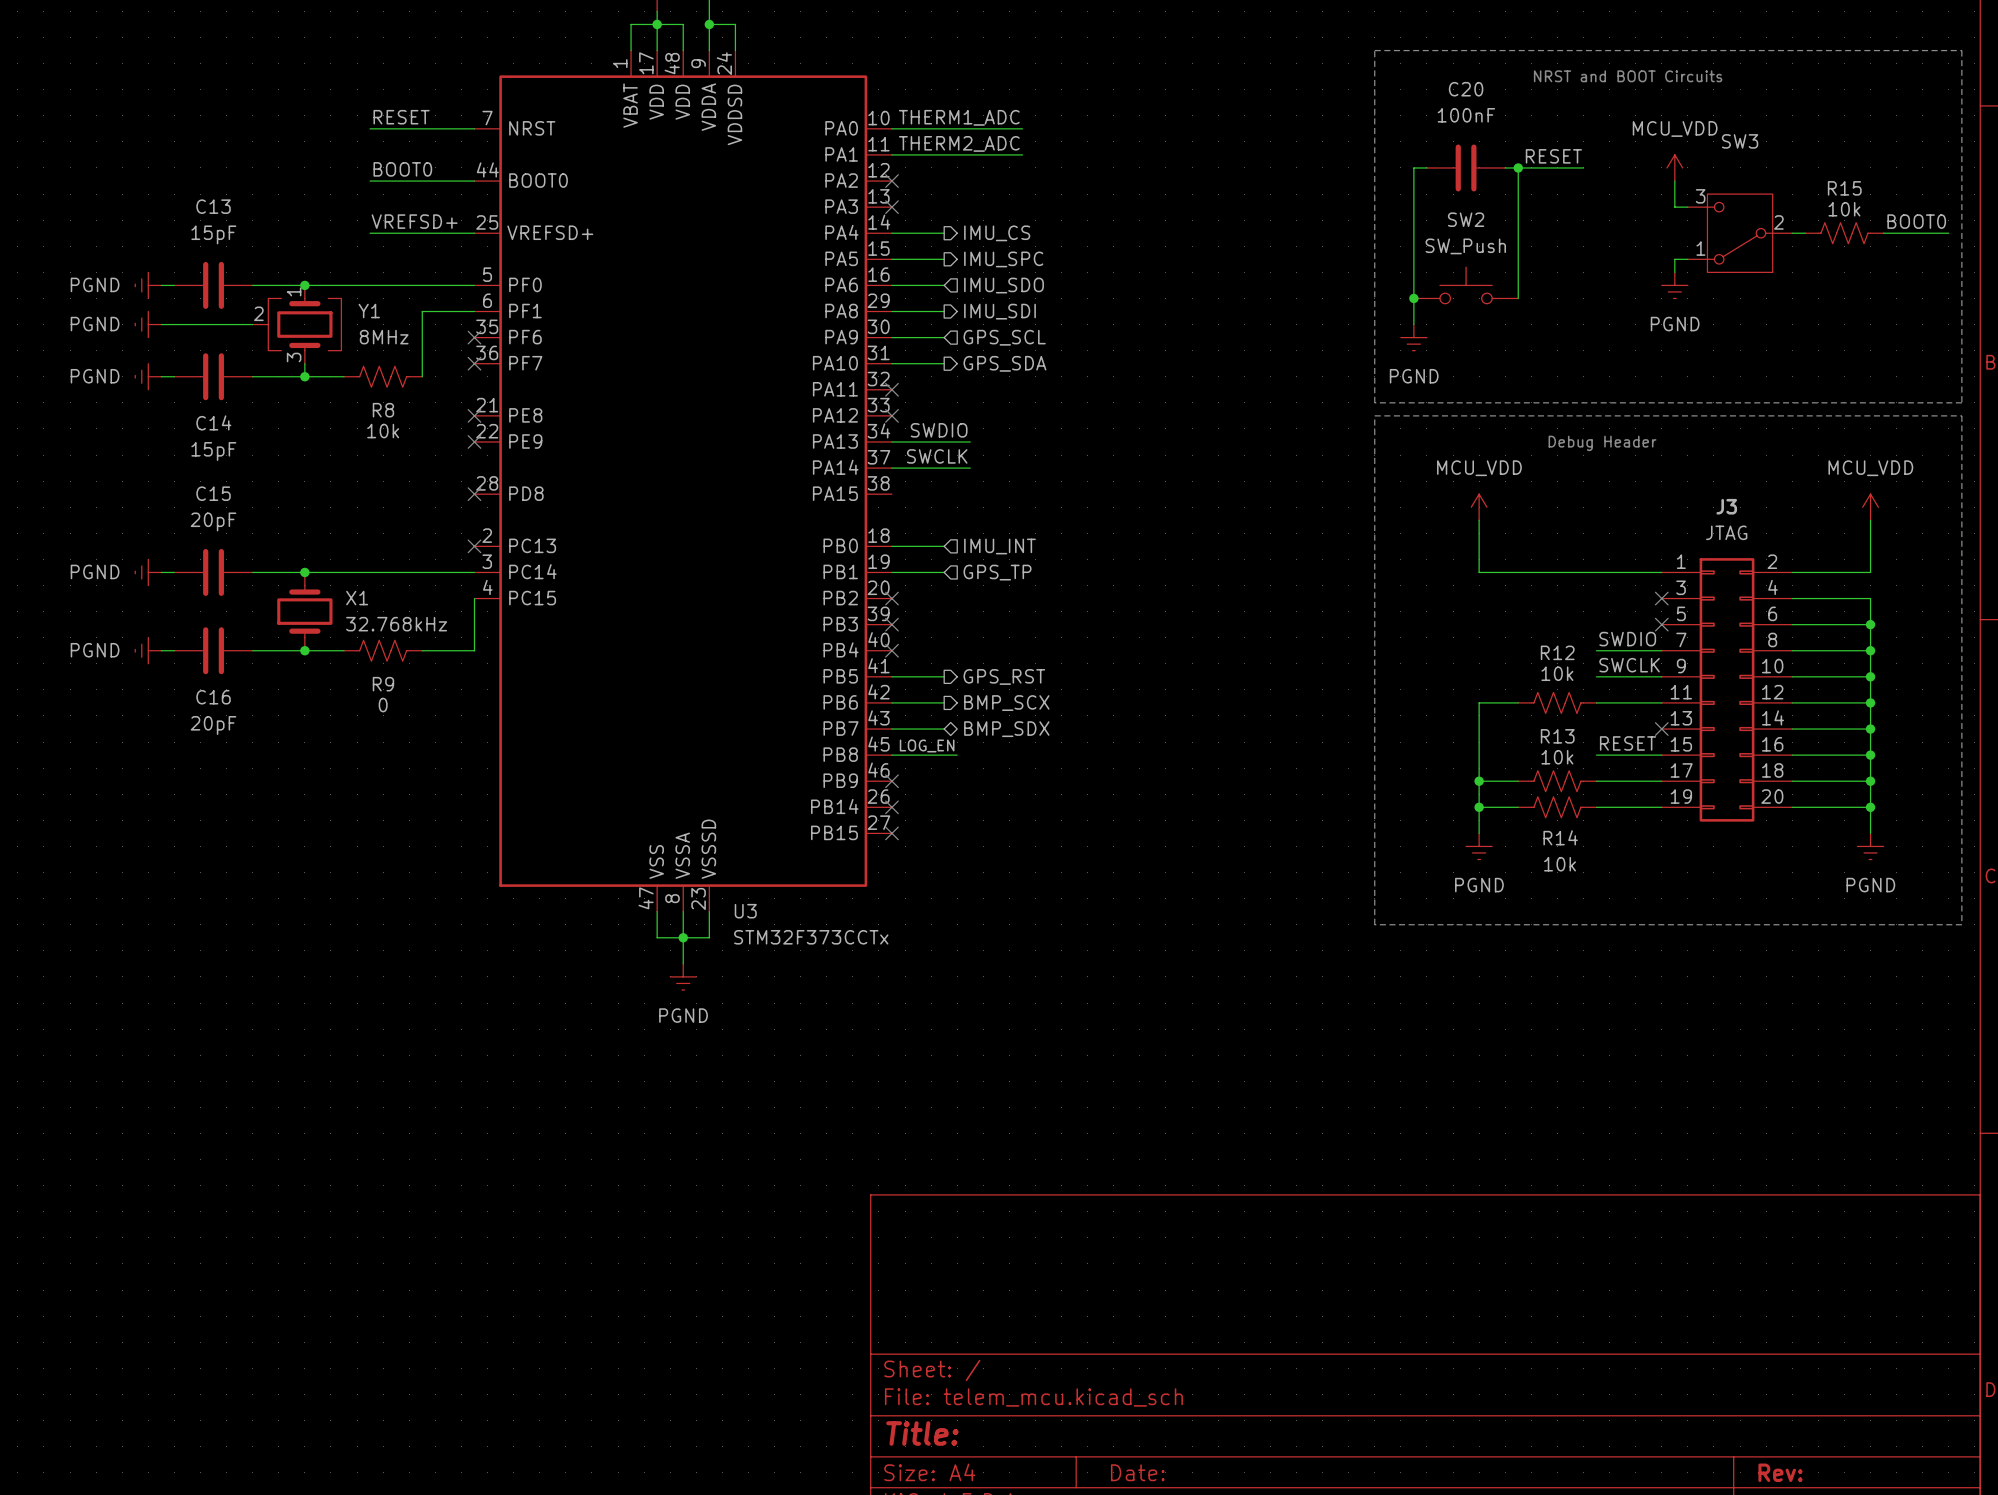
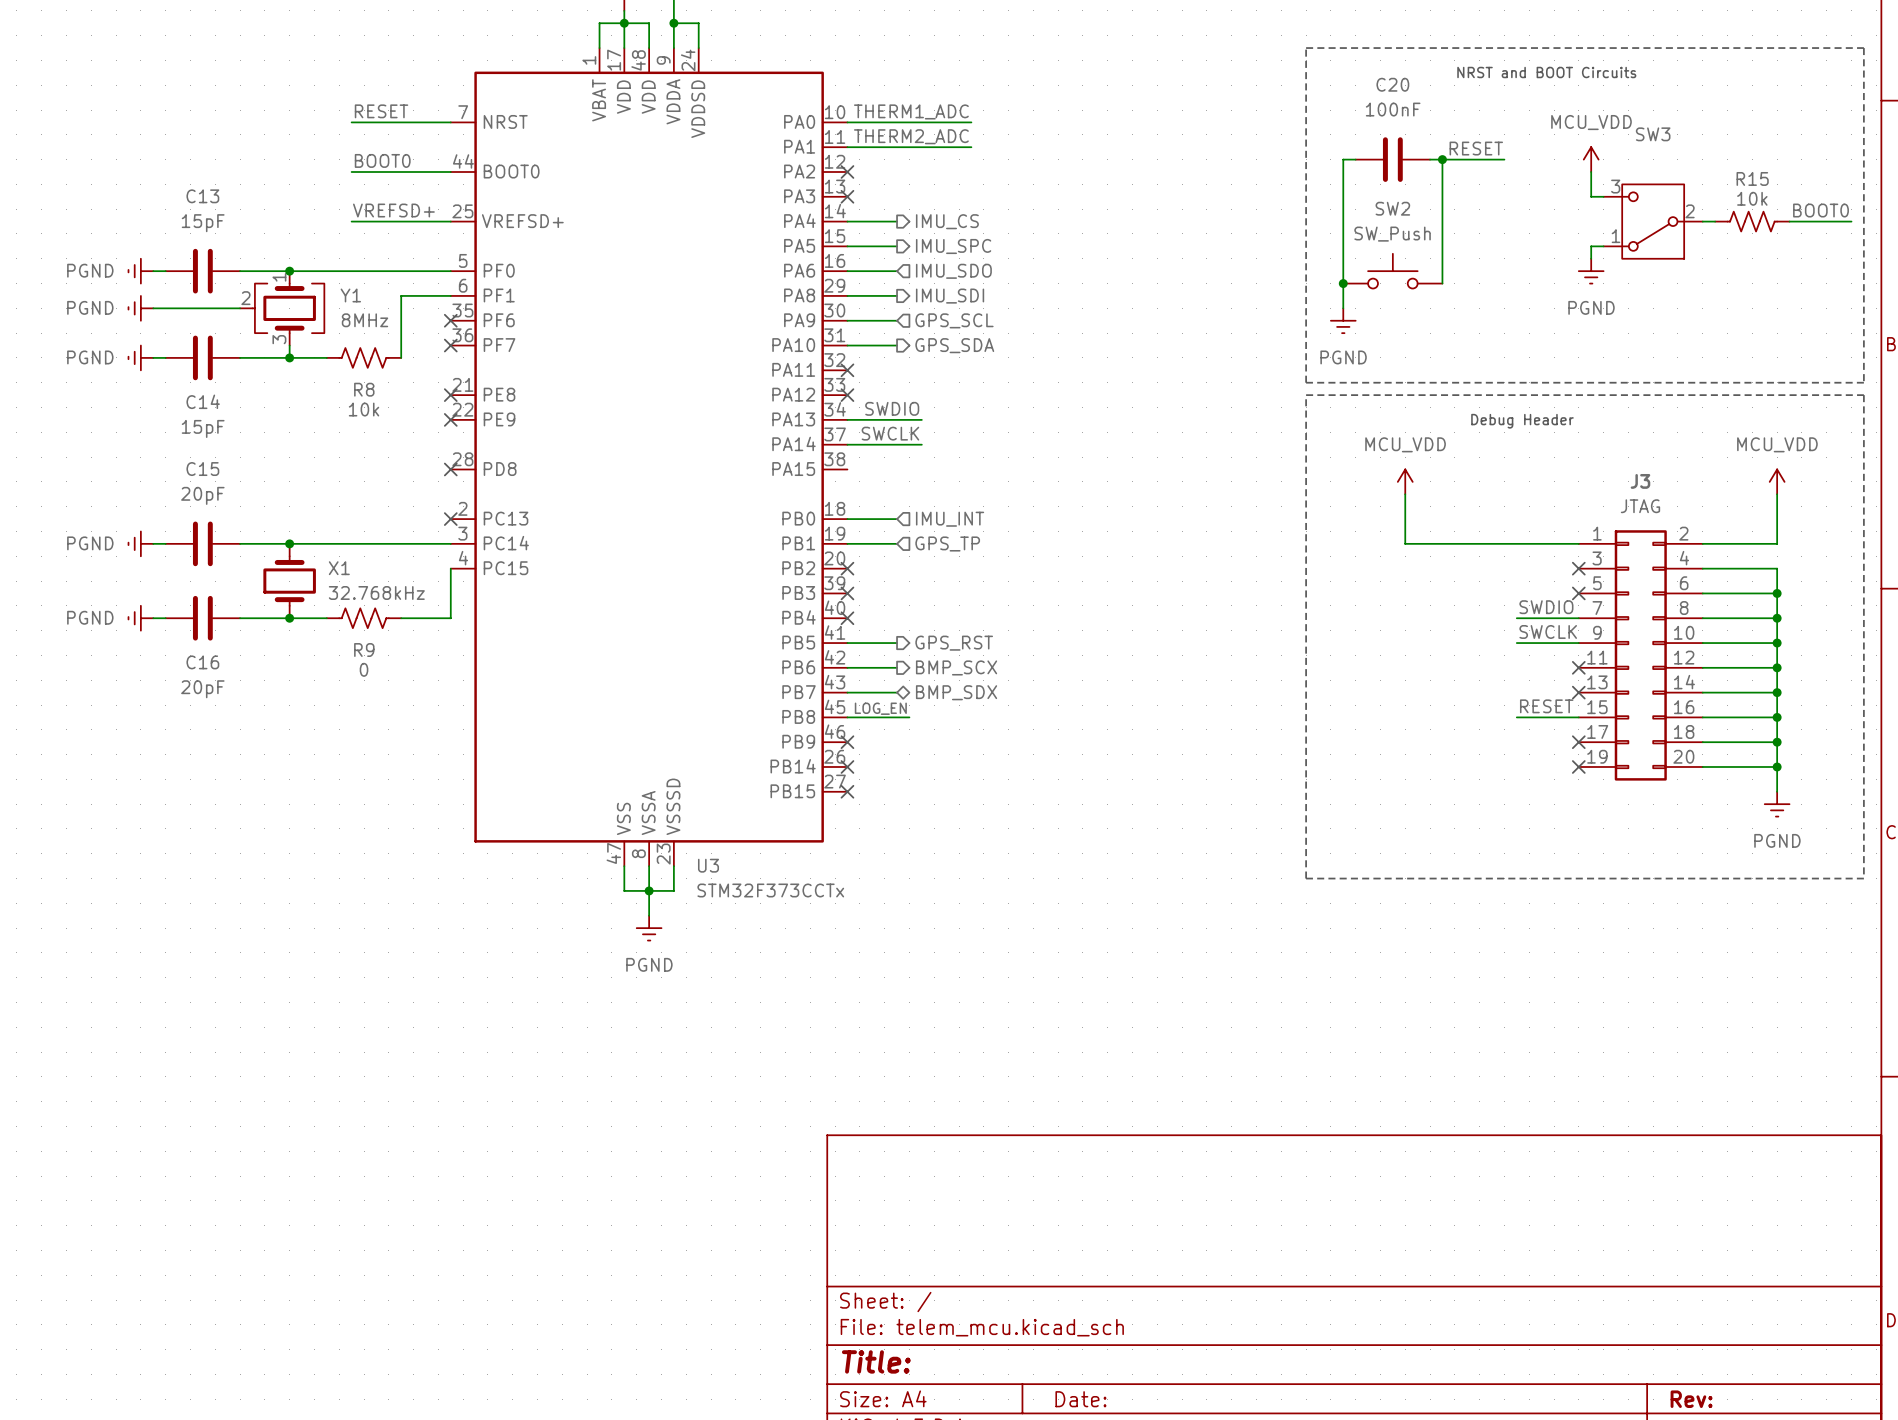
wire: (1518, 702) (1479, 702) (1479, 833) -> none
R12: 10k (1557, 702) -> none
wire: (1596, 702) (1661, 702) -> none
no-connect mark: none -> (1578, 667)
wire: (1479, 781) (1518, 781) -> none
junction: (1479, 781) -> none
R13: 10k (1557, 781) -> none
wire: (1596, 781) (1661, 781) -> none
no-connect mark: none -> (1578, 742)
wire: (1479, 807) (1518, 807) -> none
junction: (1479, 807) -> none
R14: 10k (1557, 807) -> none
wire: (1596, 807) (1661, 807) -> none
no-connect mark: none -> (1578, 766)
power symbol: PGND (1479, 846) -> none

